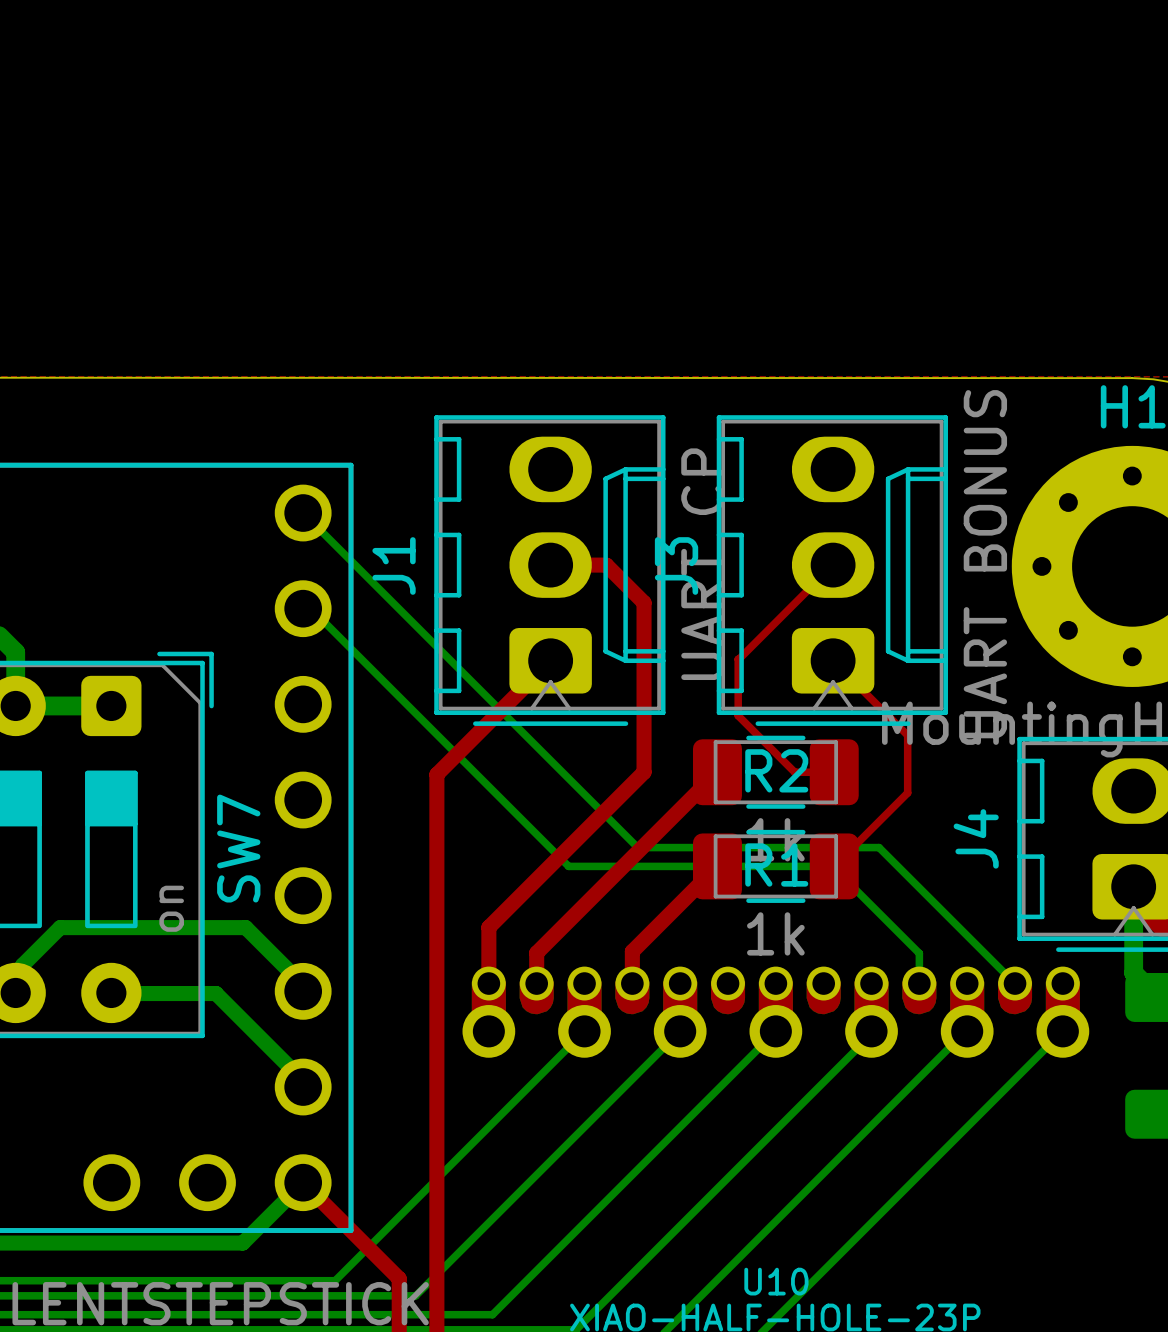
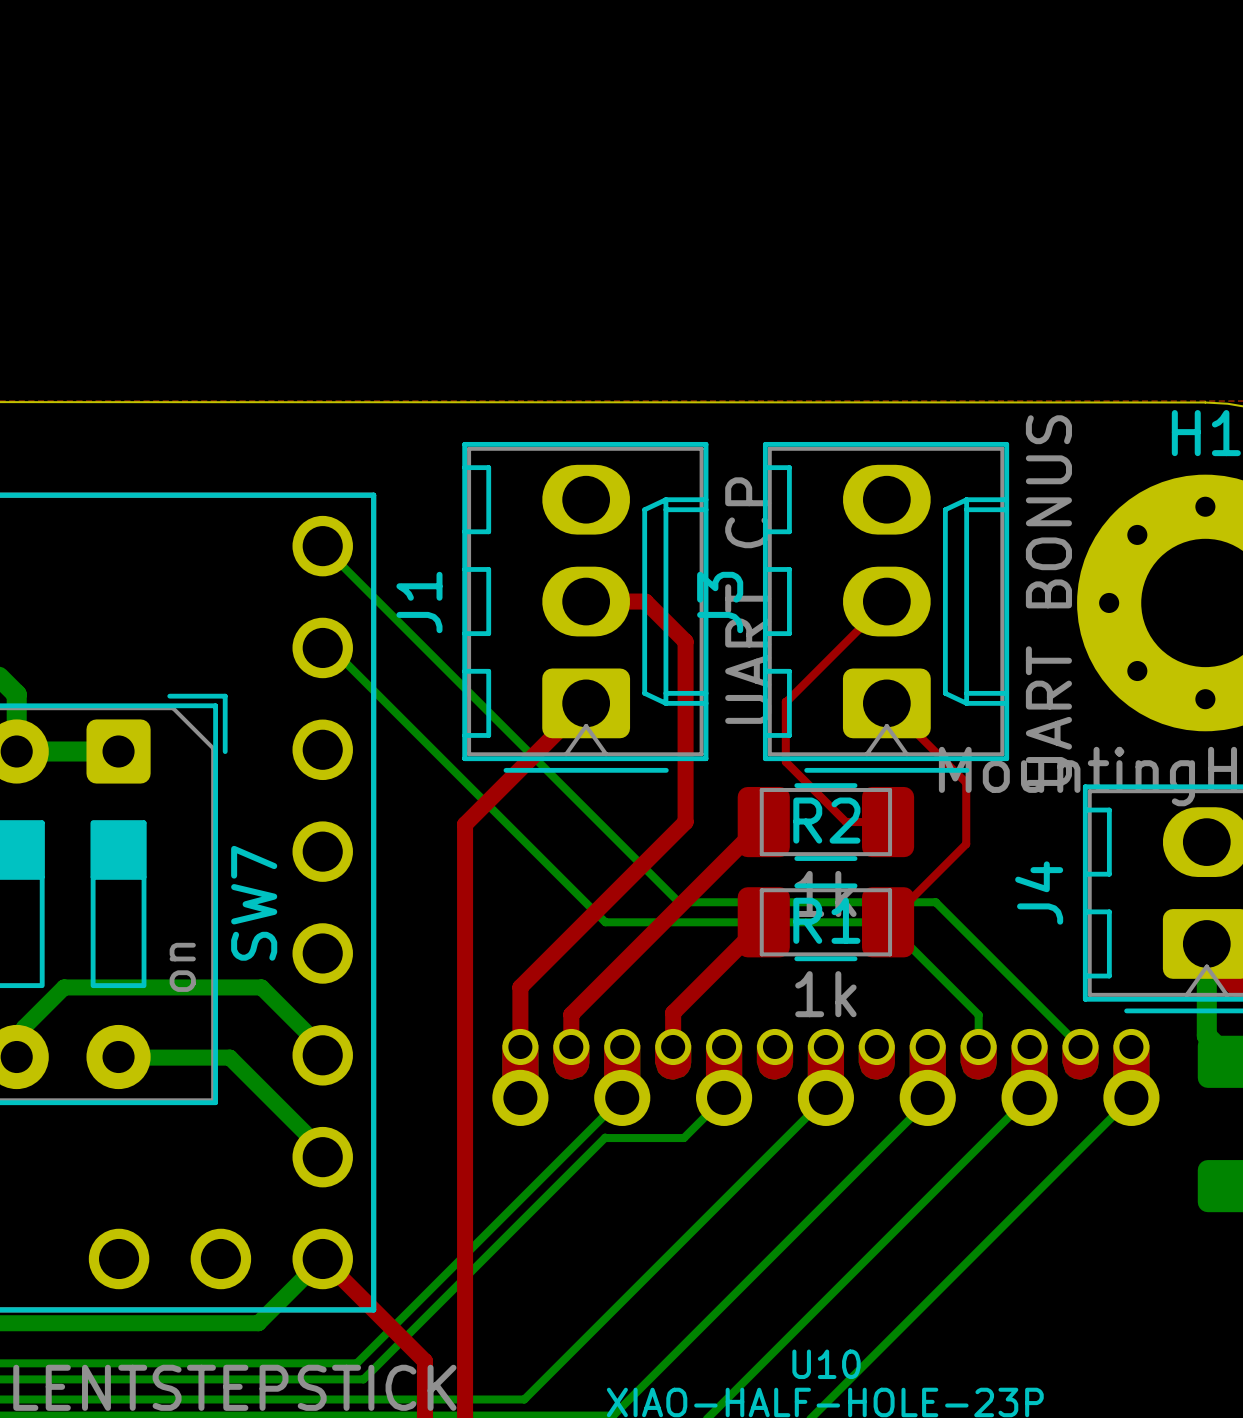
bottom track: none -> (605, 1138) (683, 1138)
bottom track: (642, 1069) (415, 1295) (341, 1295) -> (605, 1137) (363, 1379)

